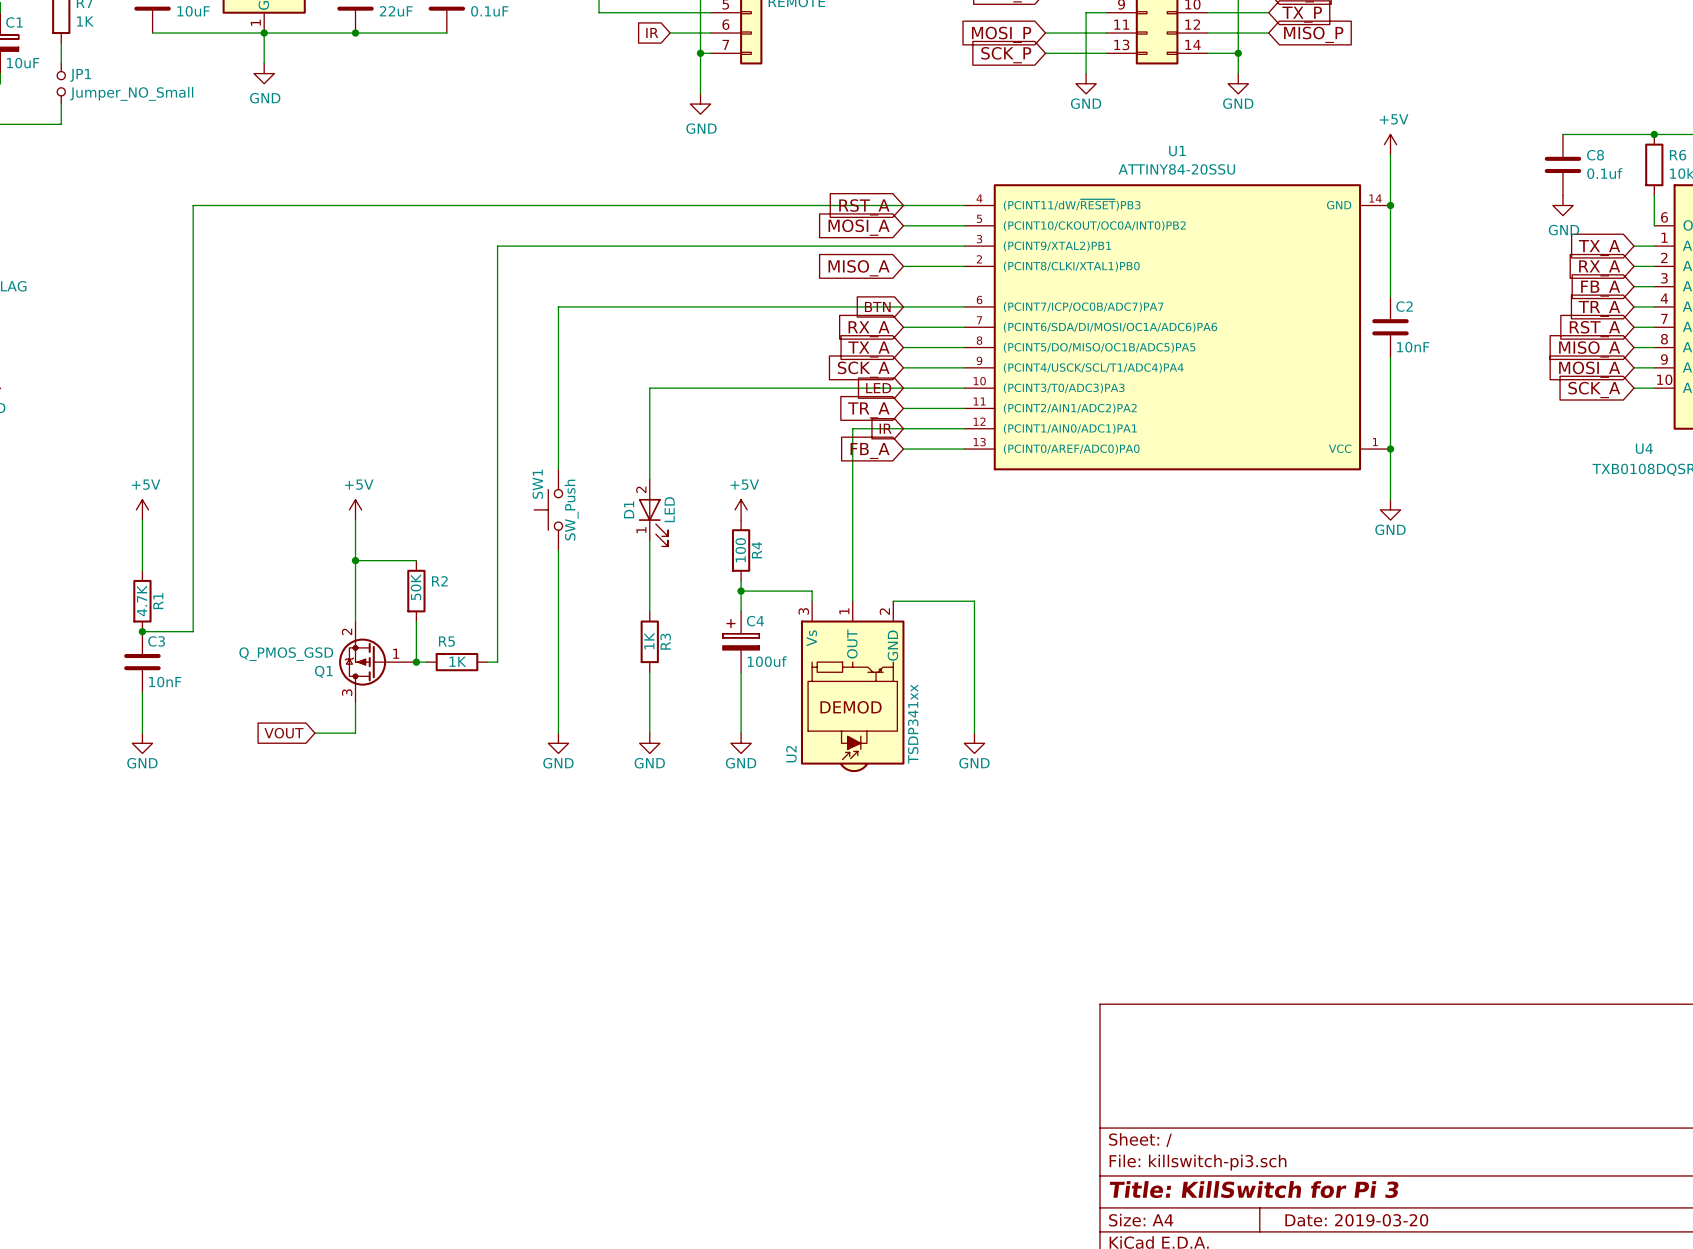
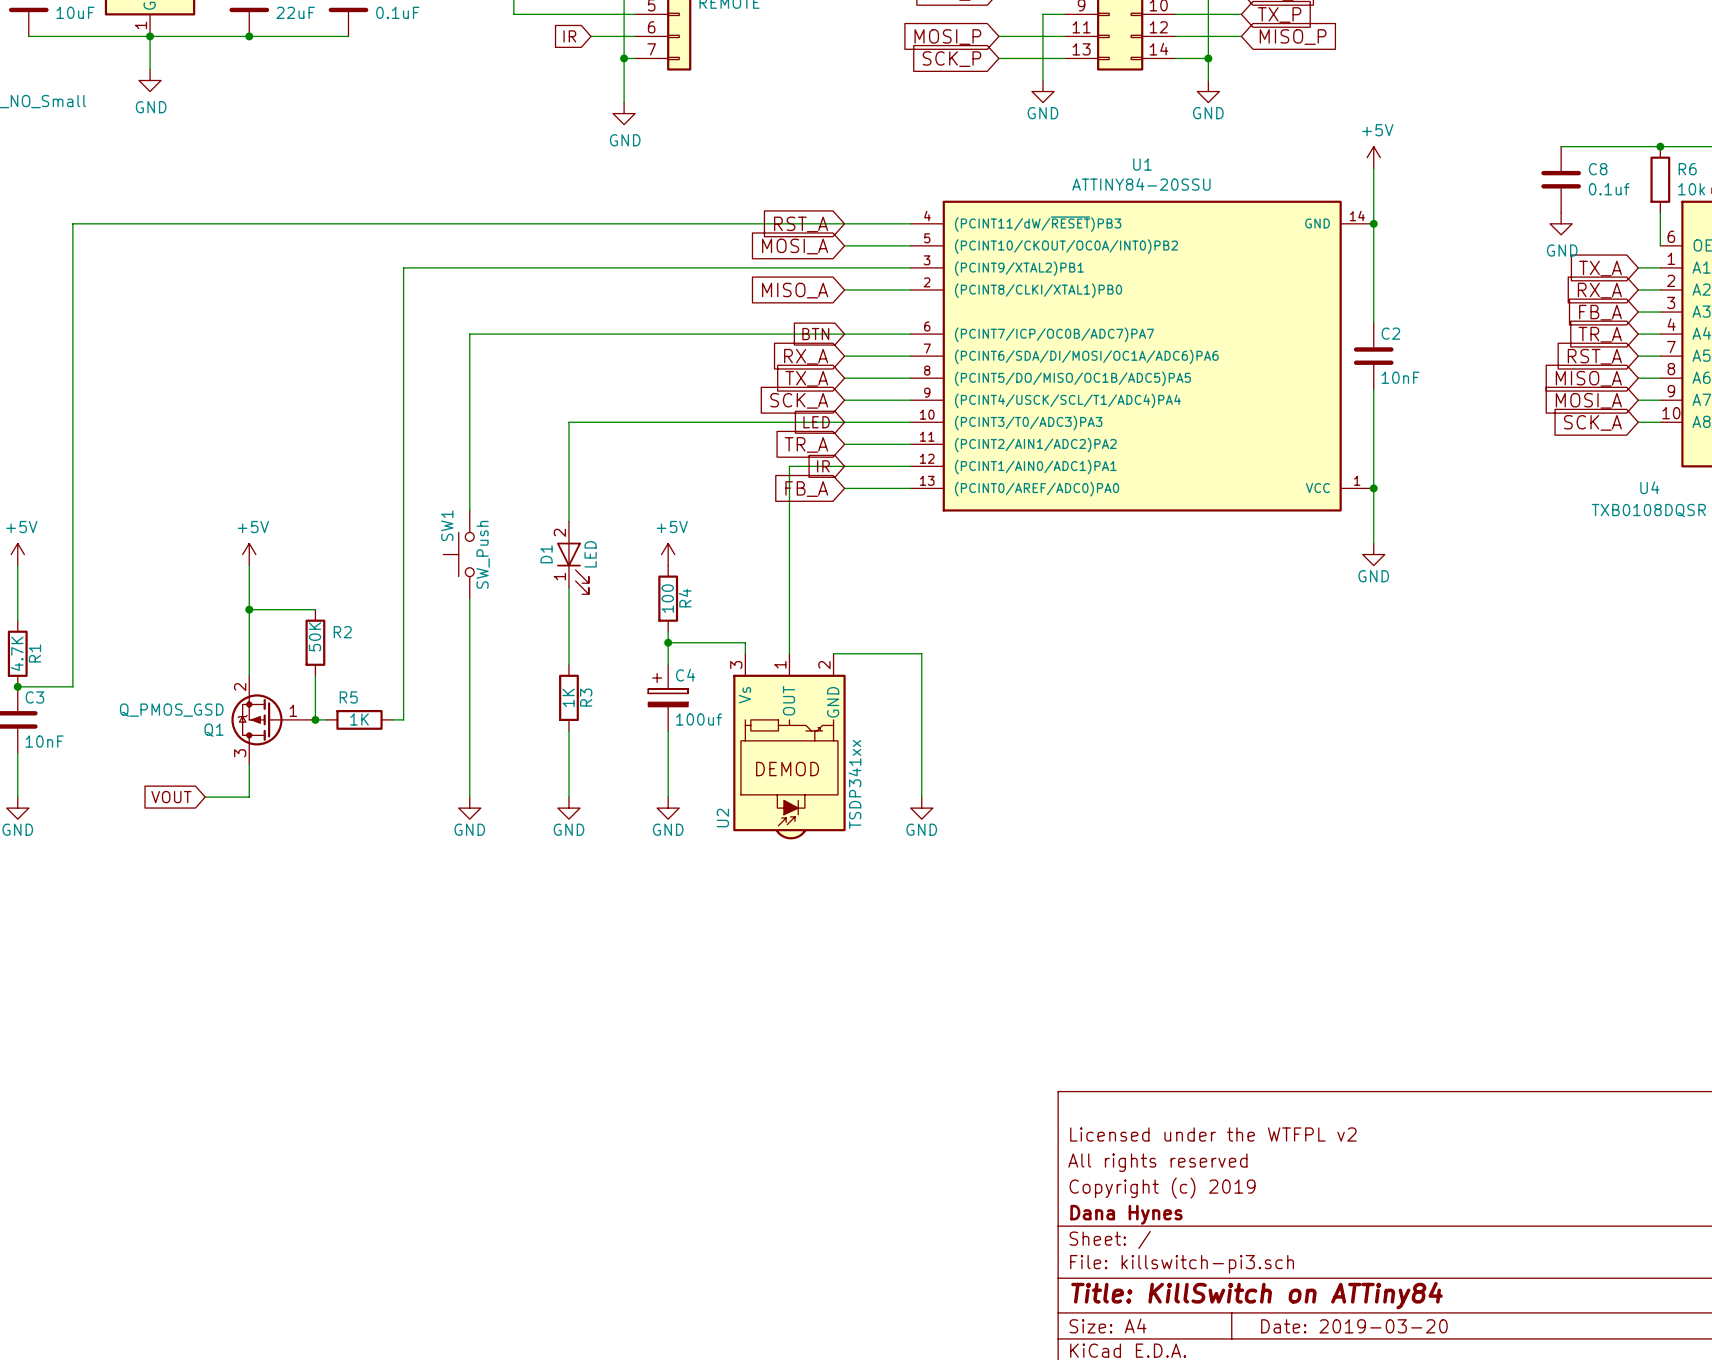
title block: none -> Licensed under the WTFPL v2 (1213, 1134)
title block: none -> All rights reserved (1157, 1162)
title block: none -> Copyright (c) 2019 (1162, 1188)
title block: none -> Dana Hynes (1126, 1214)
title block: Title: KillSwitch for Pi 3 (1254, 1189) -> Title: KillSwitch on ATTiny84 (1256, 1295)

